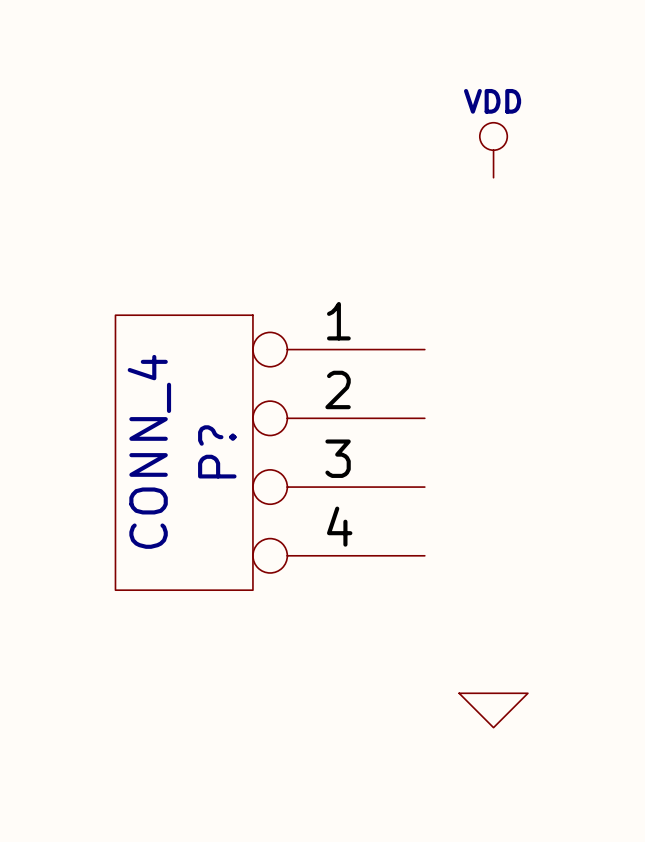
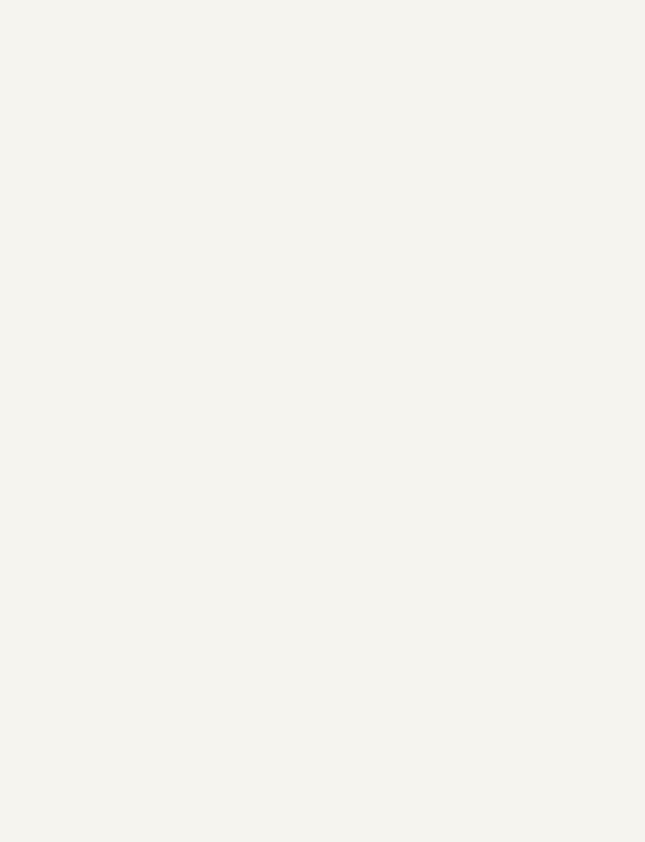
power symbol: VDD (493, 150) -> none
P?: CONN_4 (270, 452) -> none
power symbol: (493, 710) -> none

